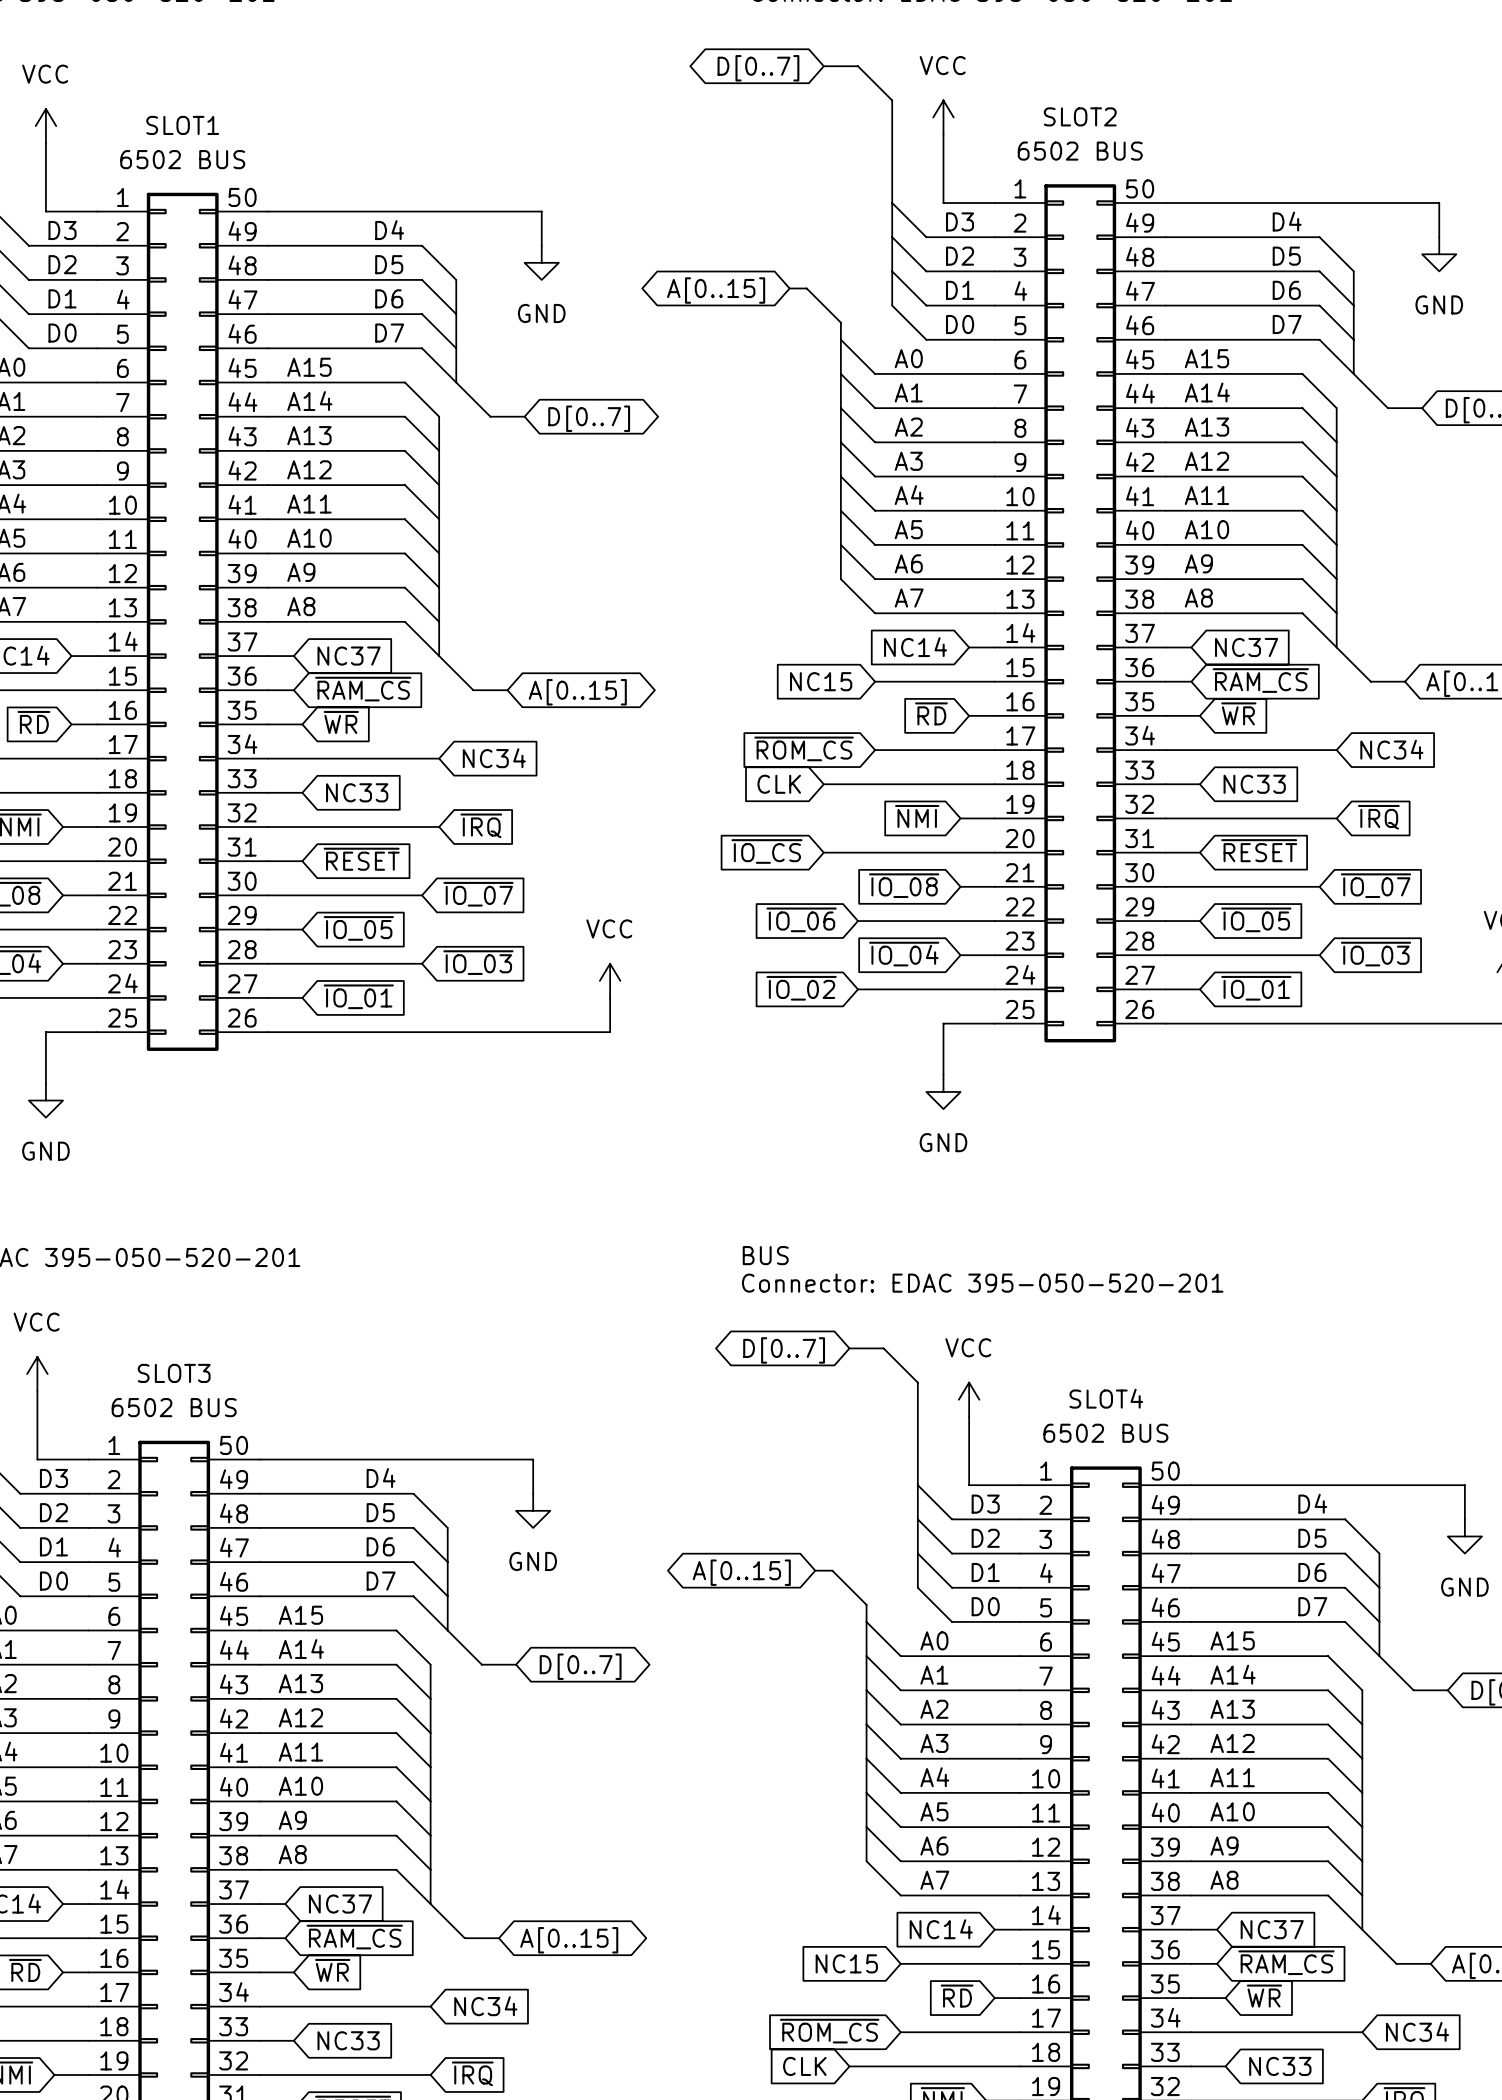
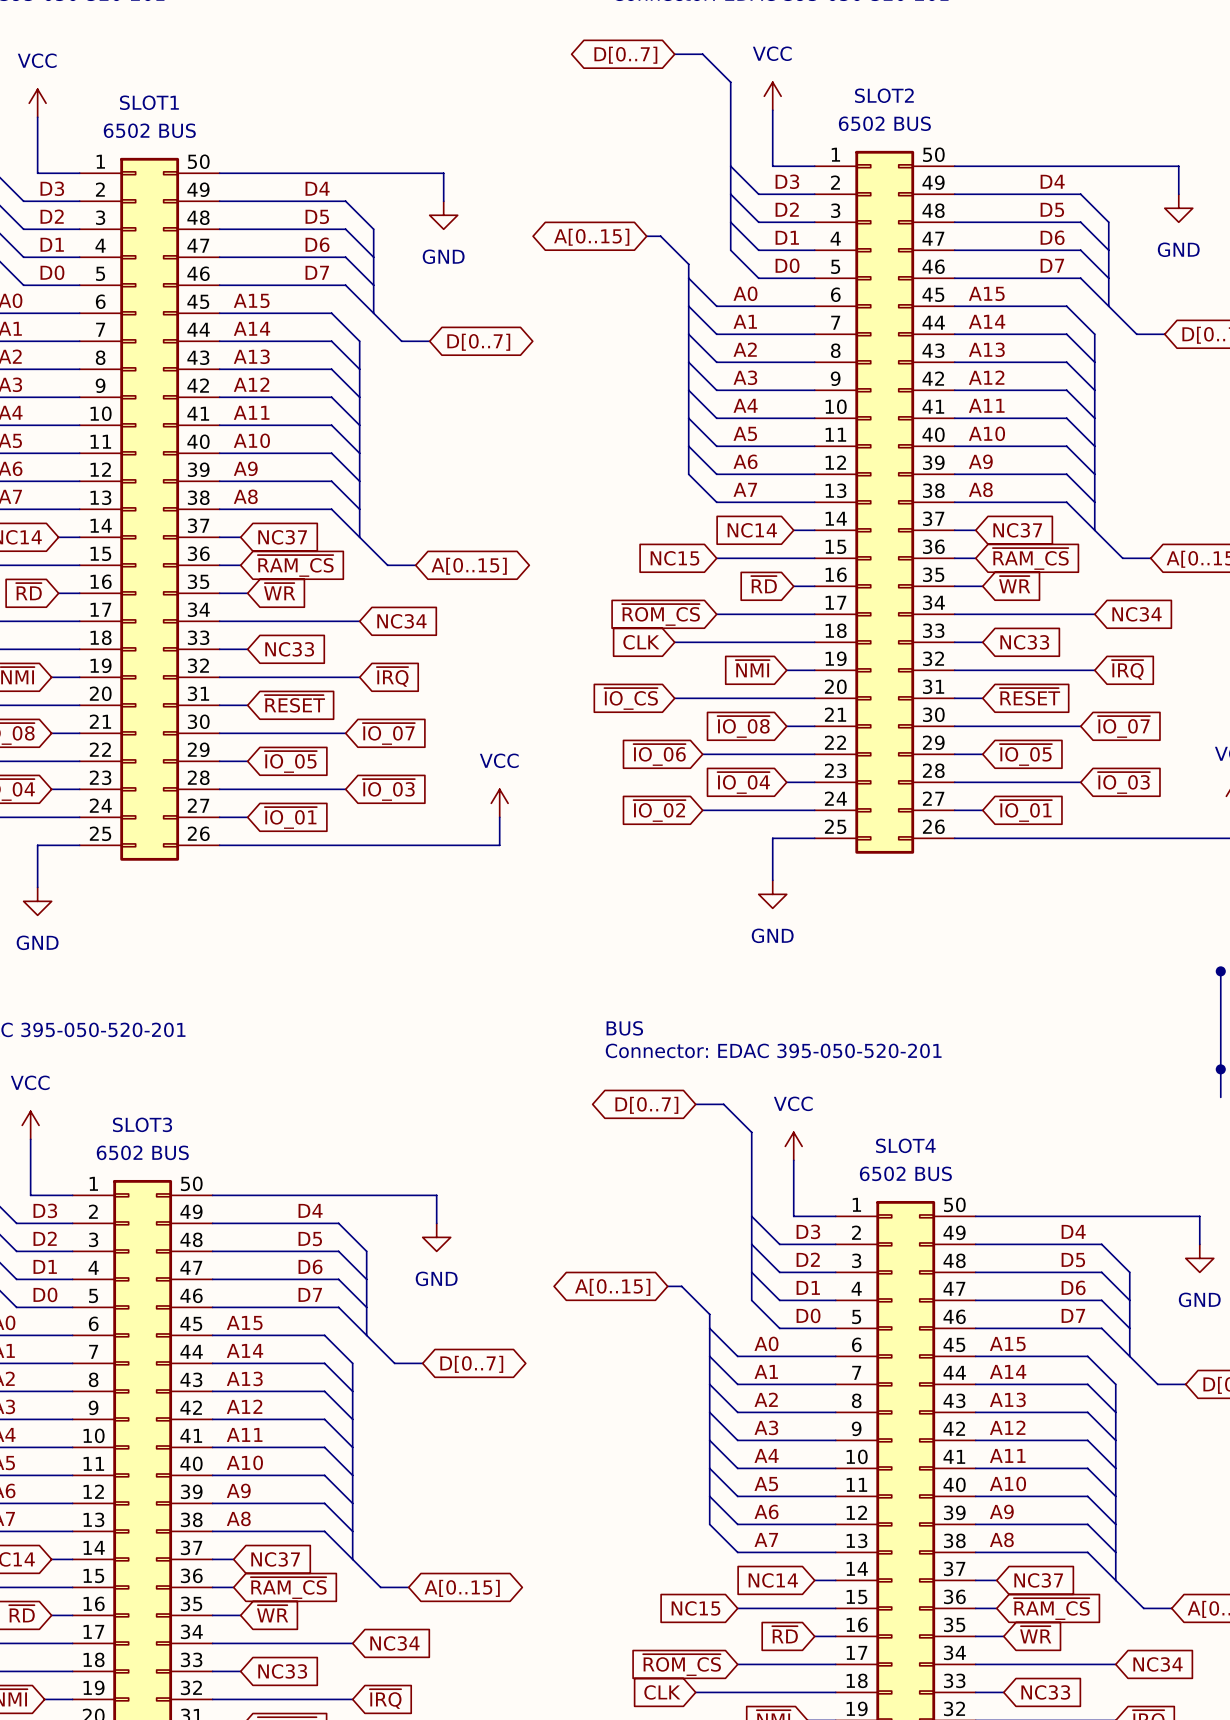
wire: none -> (1220, 971) (1220, 1097)
junction: none -> (1220, 971)
junction: none -> (1220, 1069)

